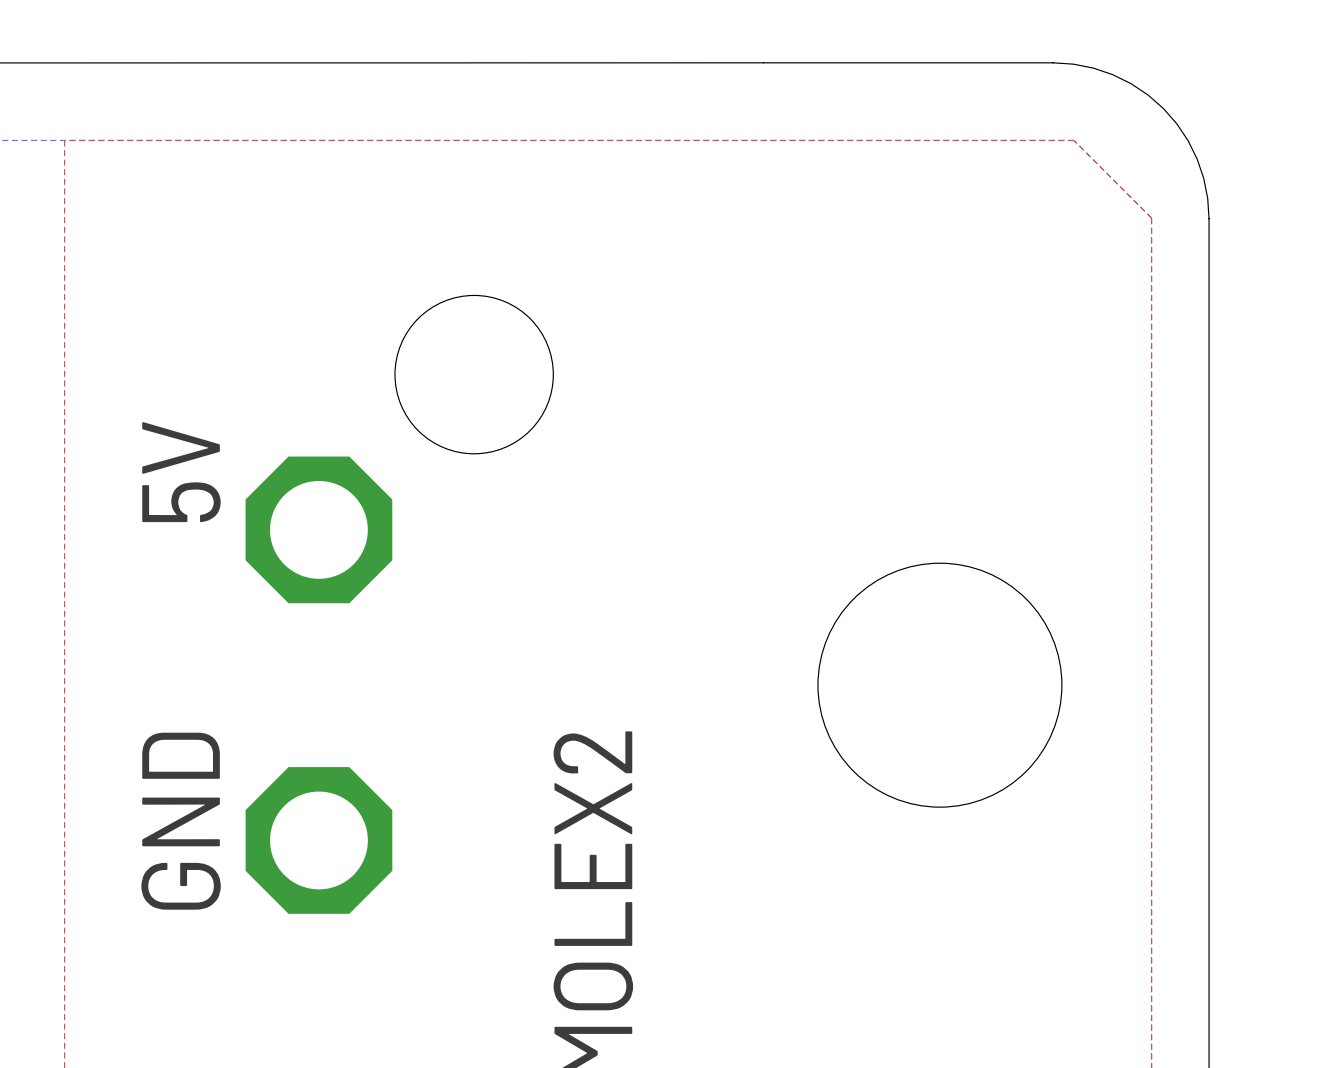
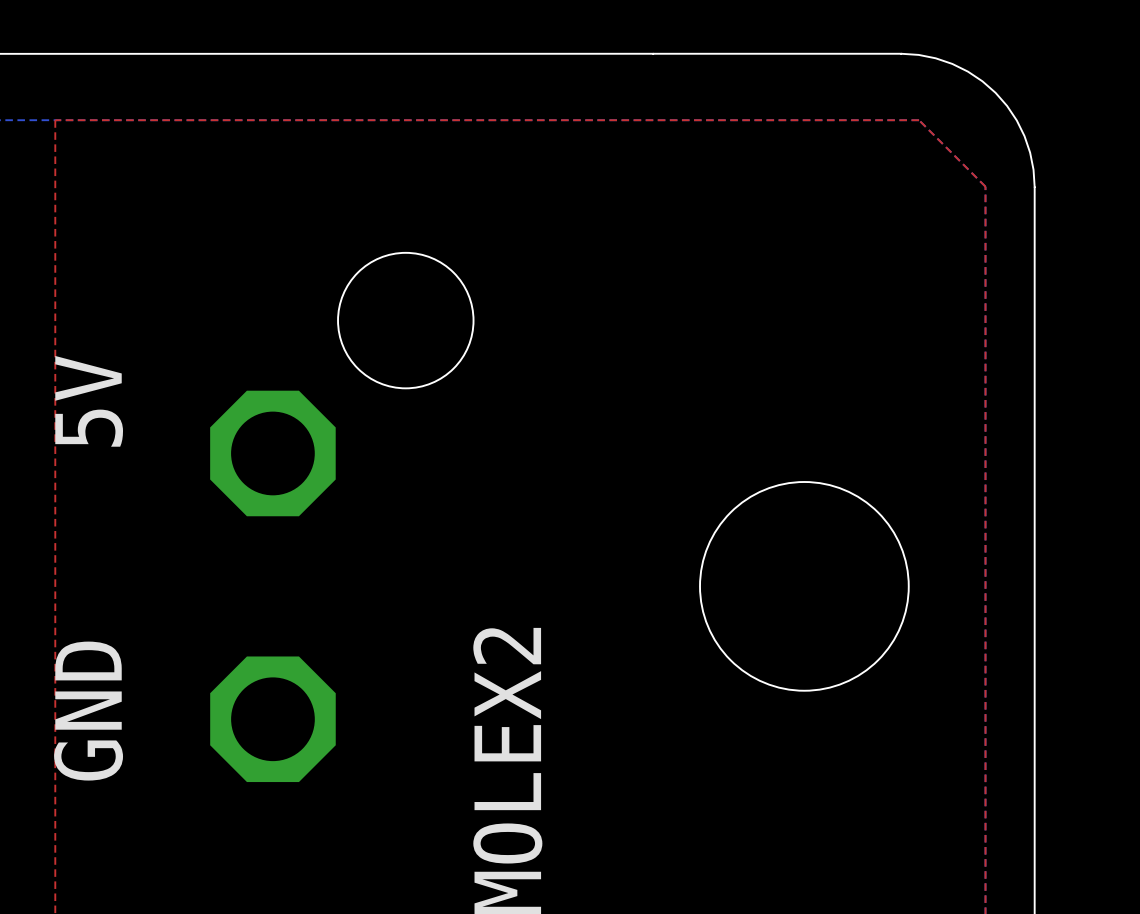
text position: 5V (181, 471) -> 5V (89, 401)
text position: GND (181, 821) -> GND (88, 711)

